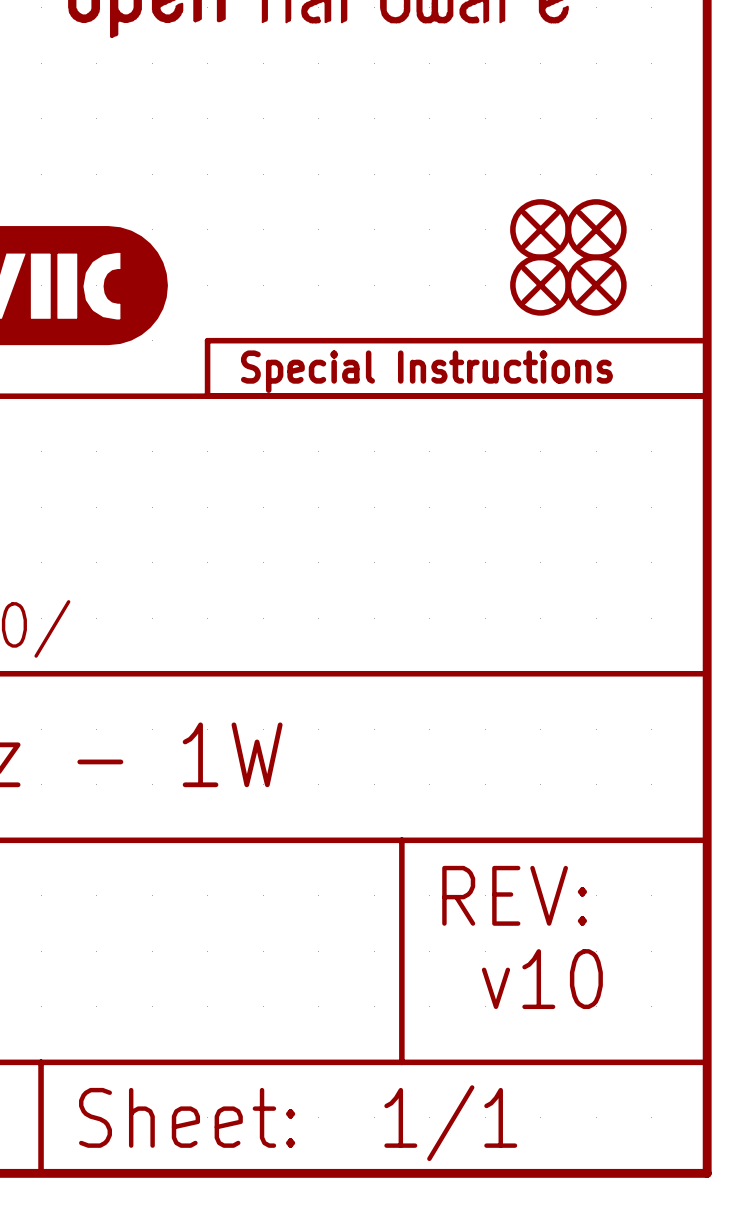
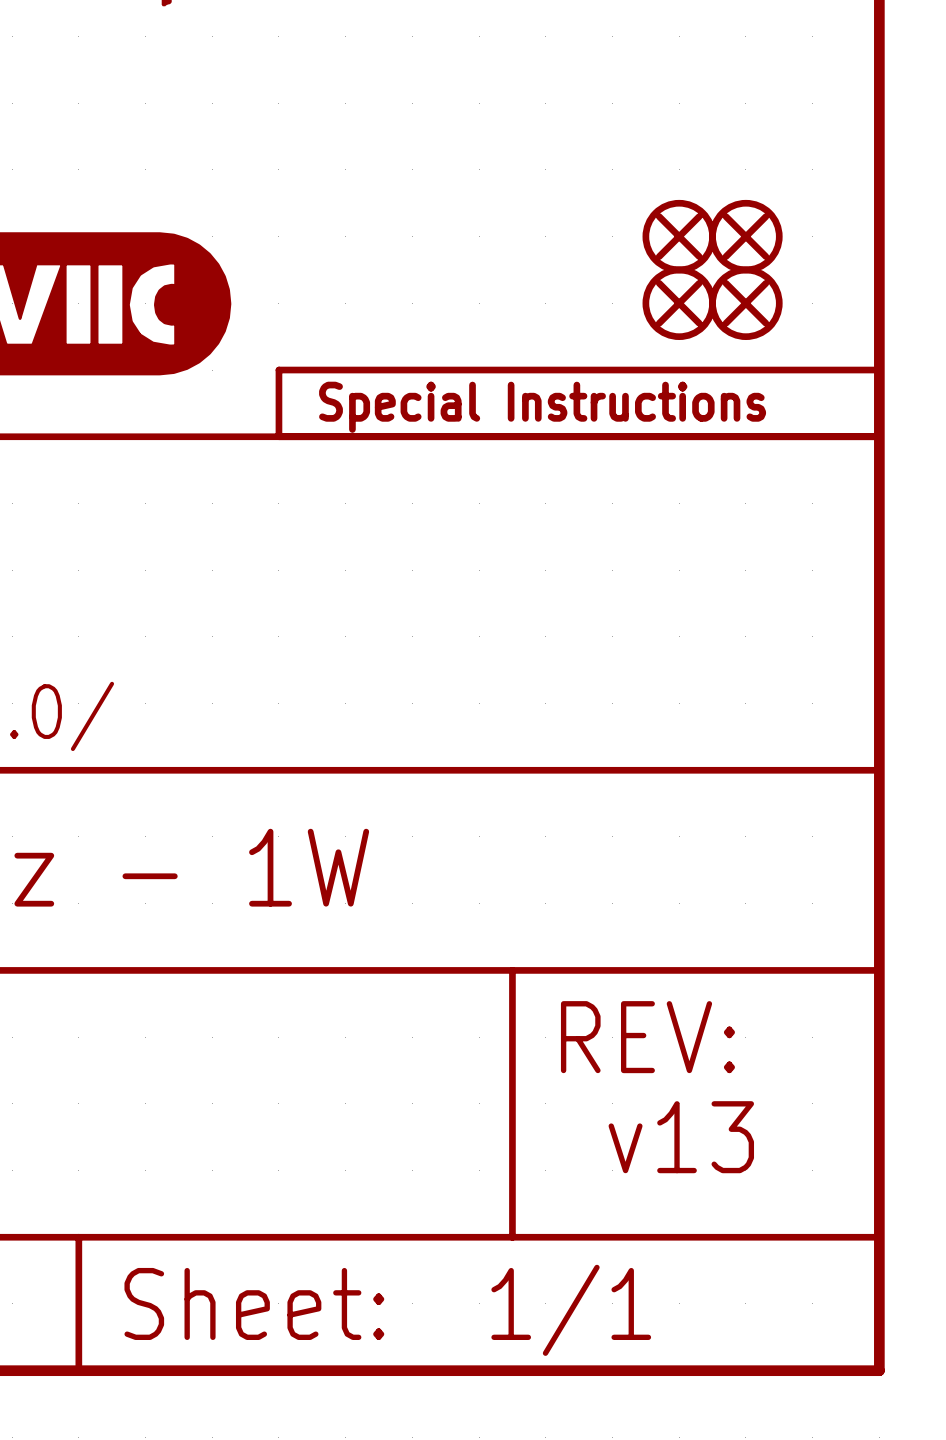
text: v10 (542, 979) -> v13 (681, 1137)

